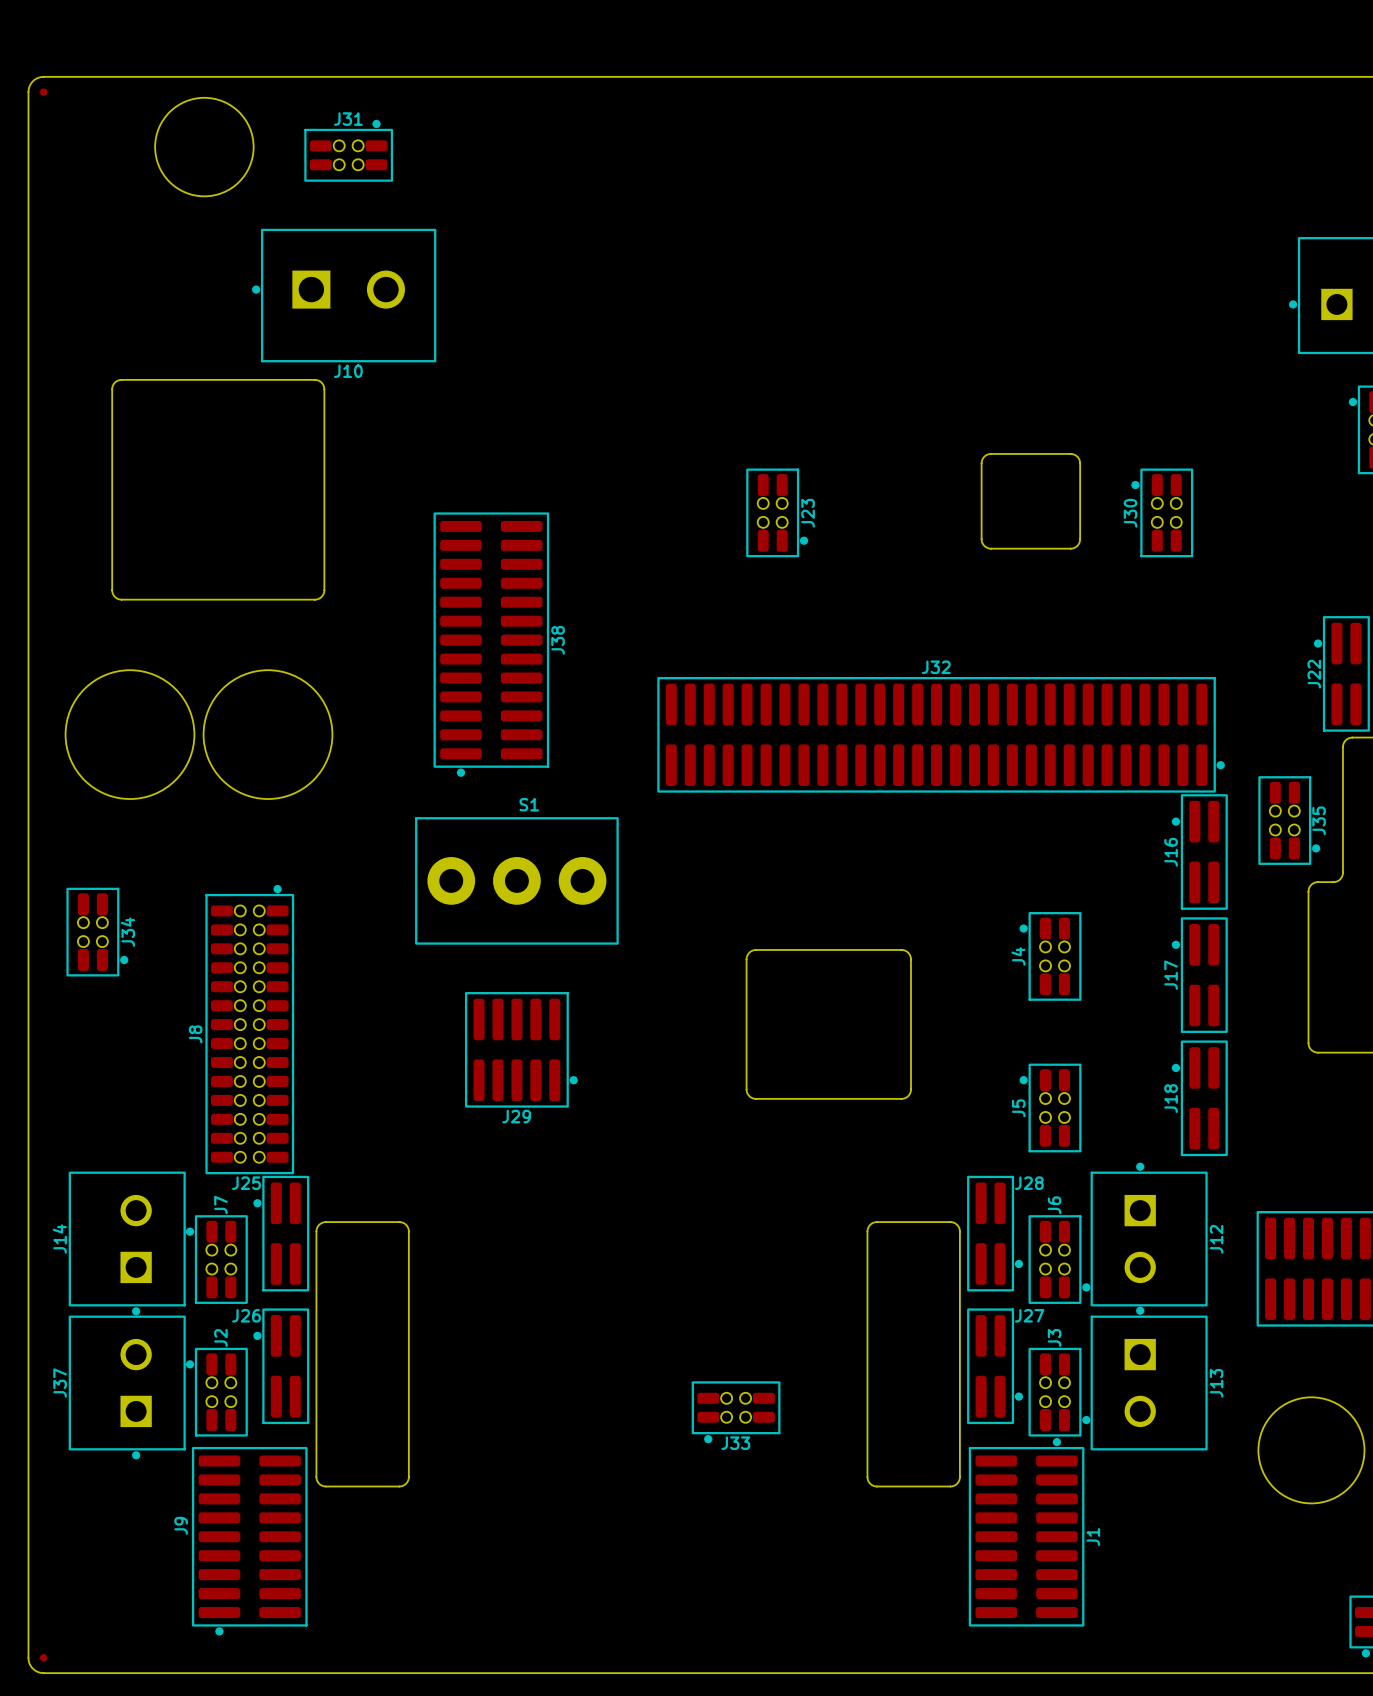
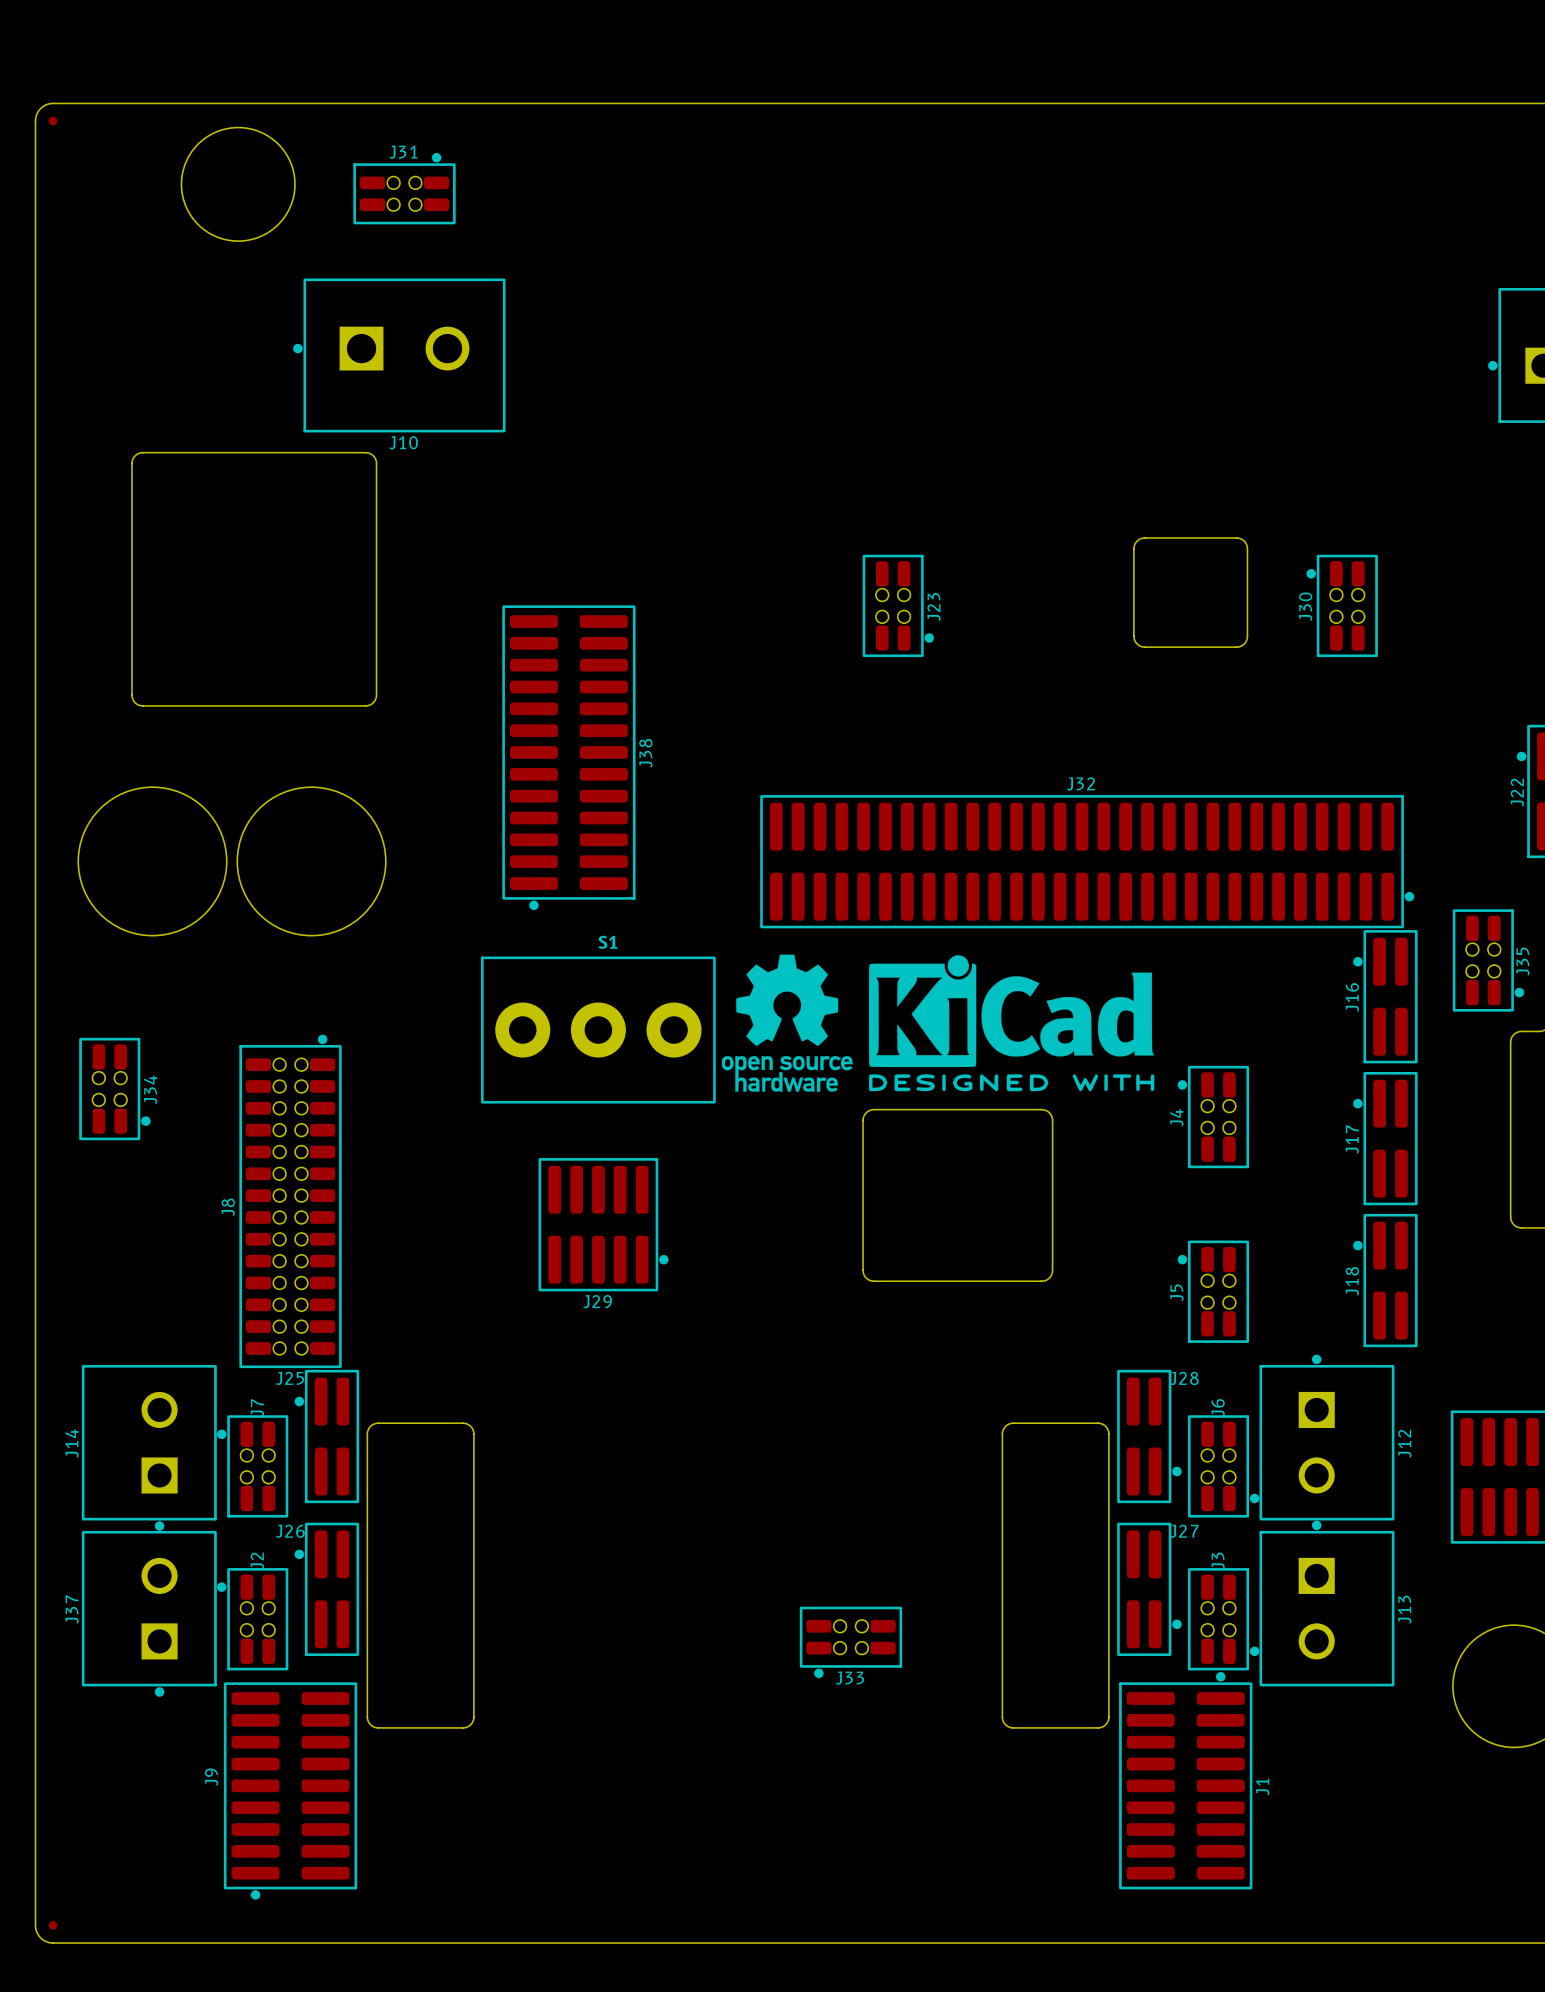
drawing: none -> [721, 954, 1155, 1092]

